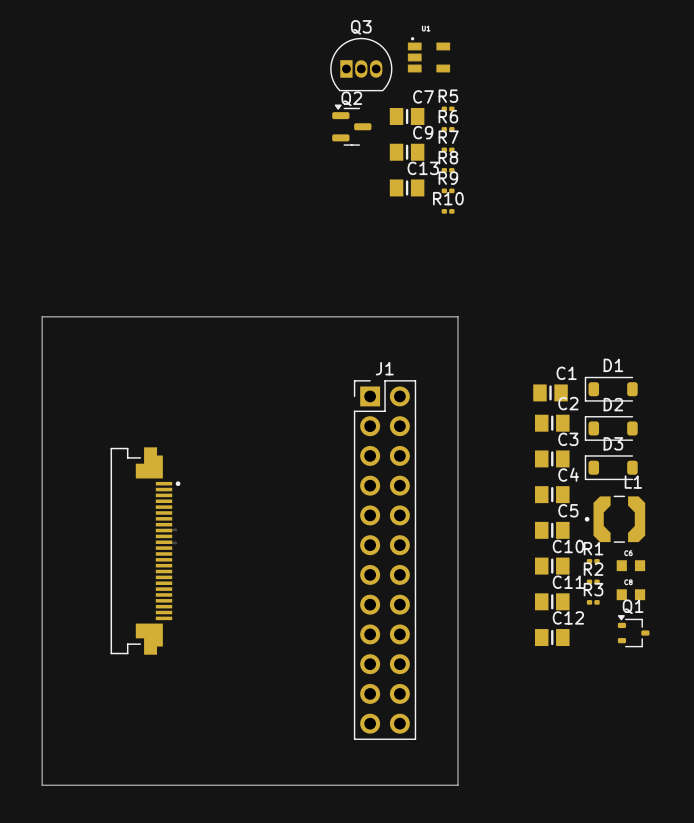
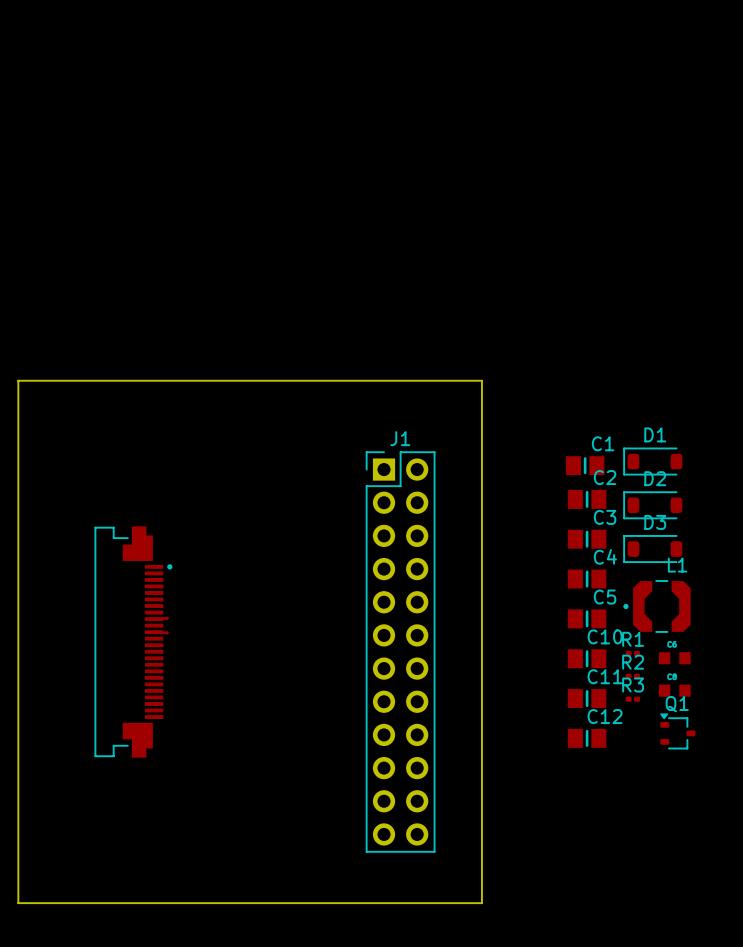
part: (428, 54) -> none
Q3: (361, 64) -> none
R5: (448, 108) -> none
C7: (407, 116) -> none
Q2: (351, 125) -> none
R6: (448, 129) -> none
R7: (448, 149) -> none
C9: (407, 152) -> none
R8: (448, 170) -> none
C13: (407, 187) -> none
R9: (448, 190) -> none
R10: (448, 211) -> none

